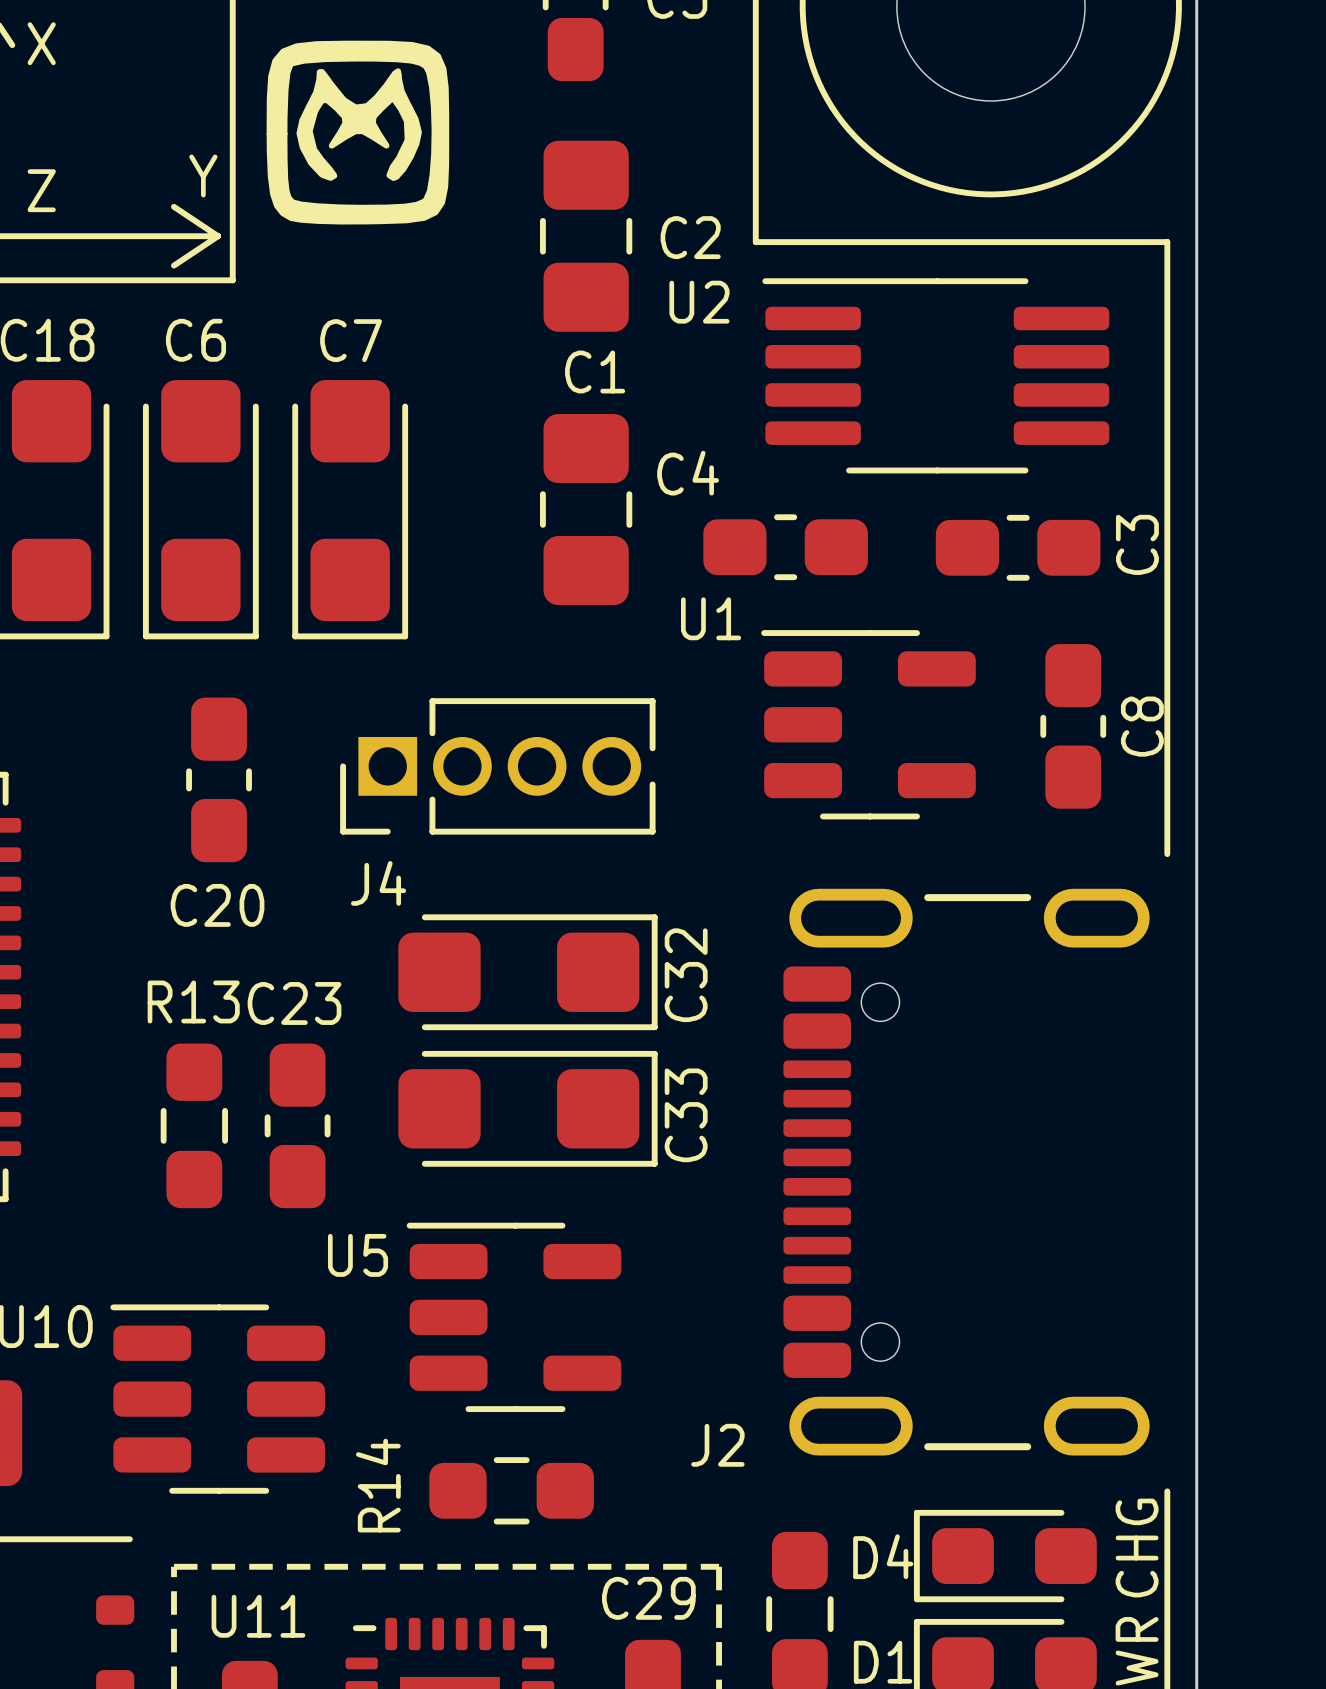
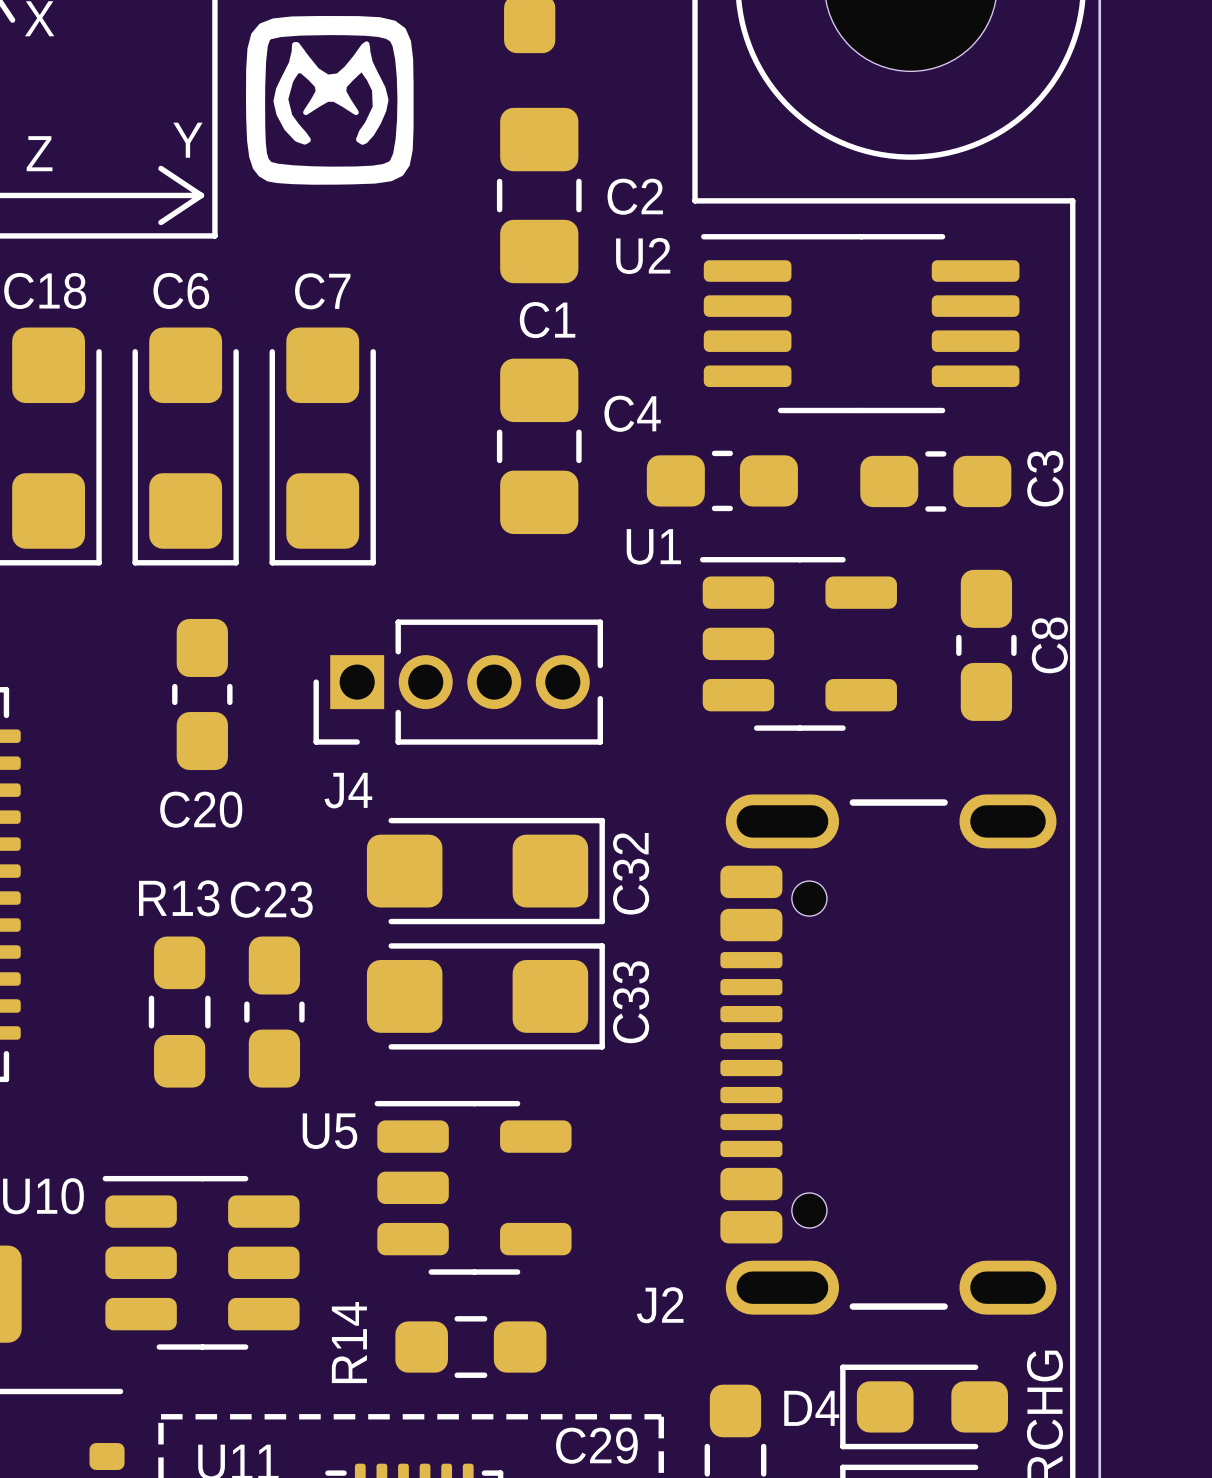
line: none -> (1072, 762) (1072, 1347)

